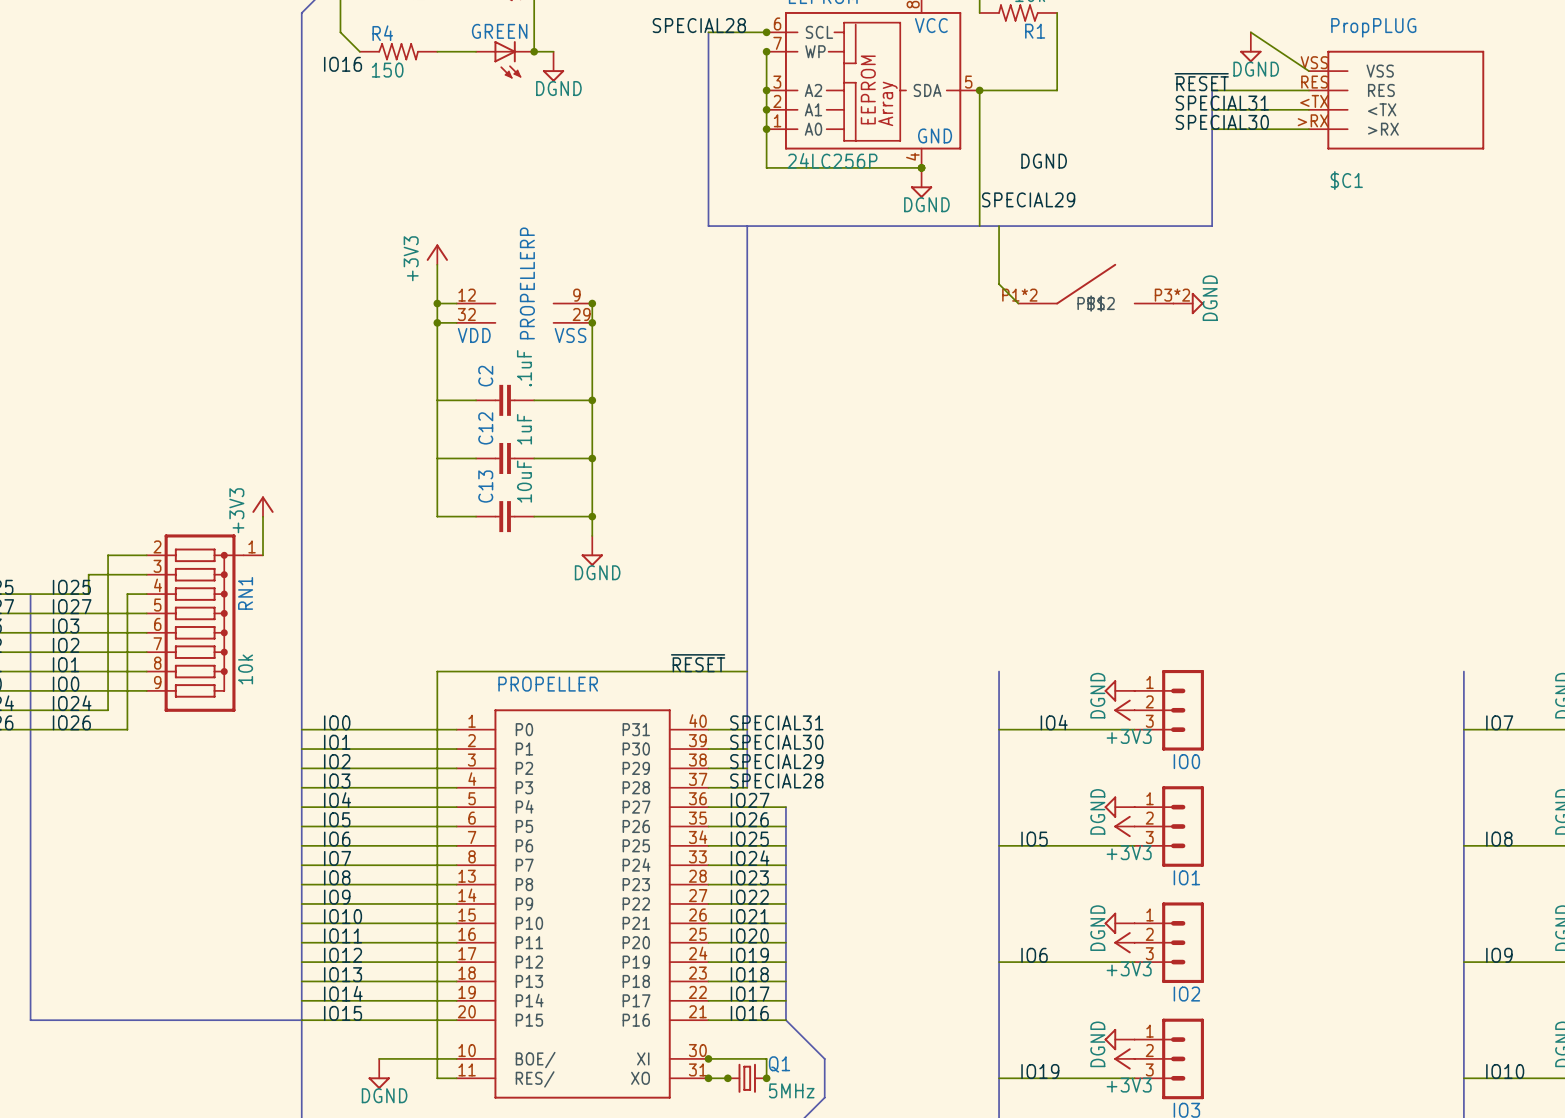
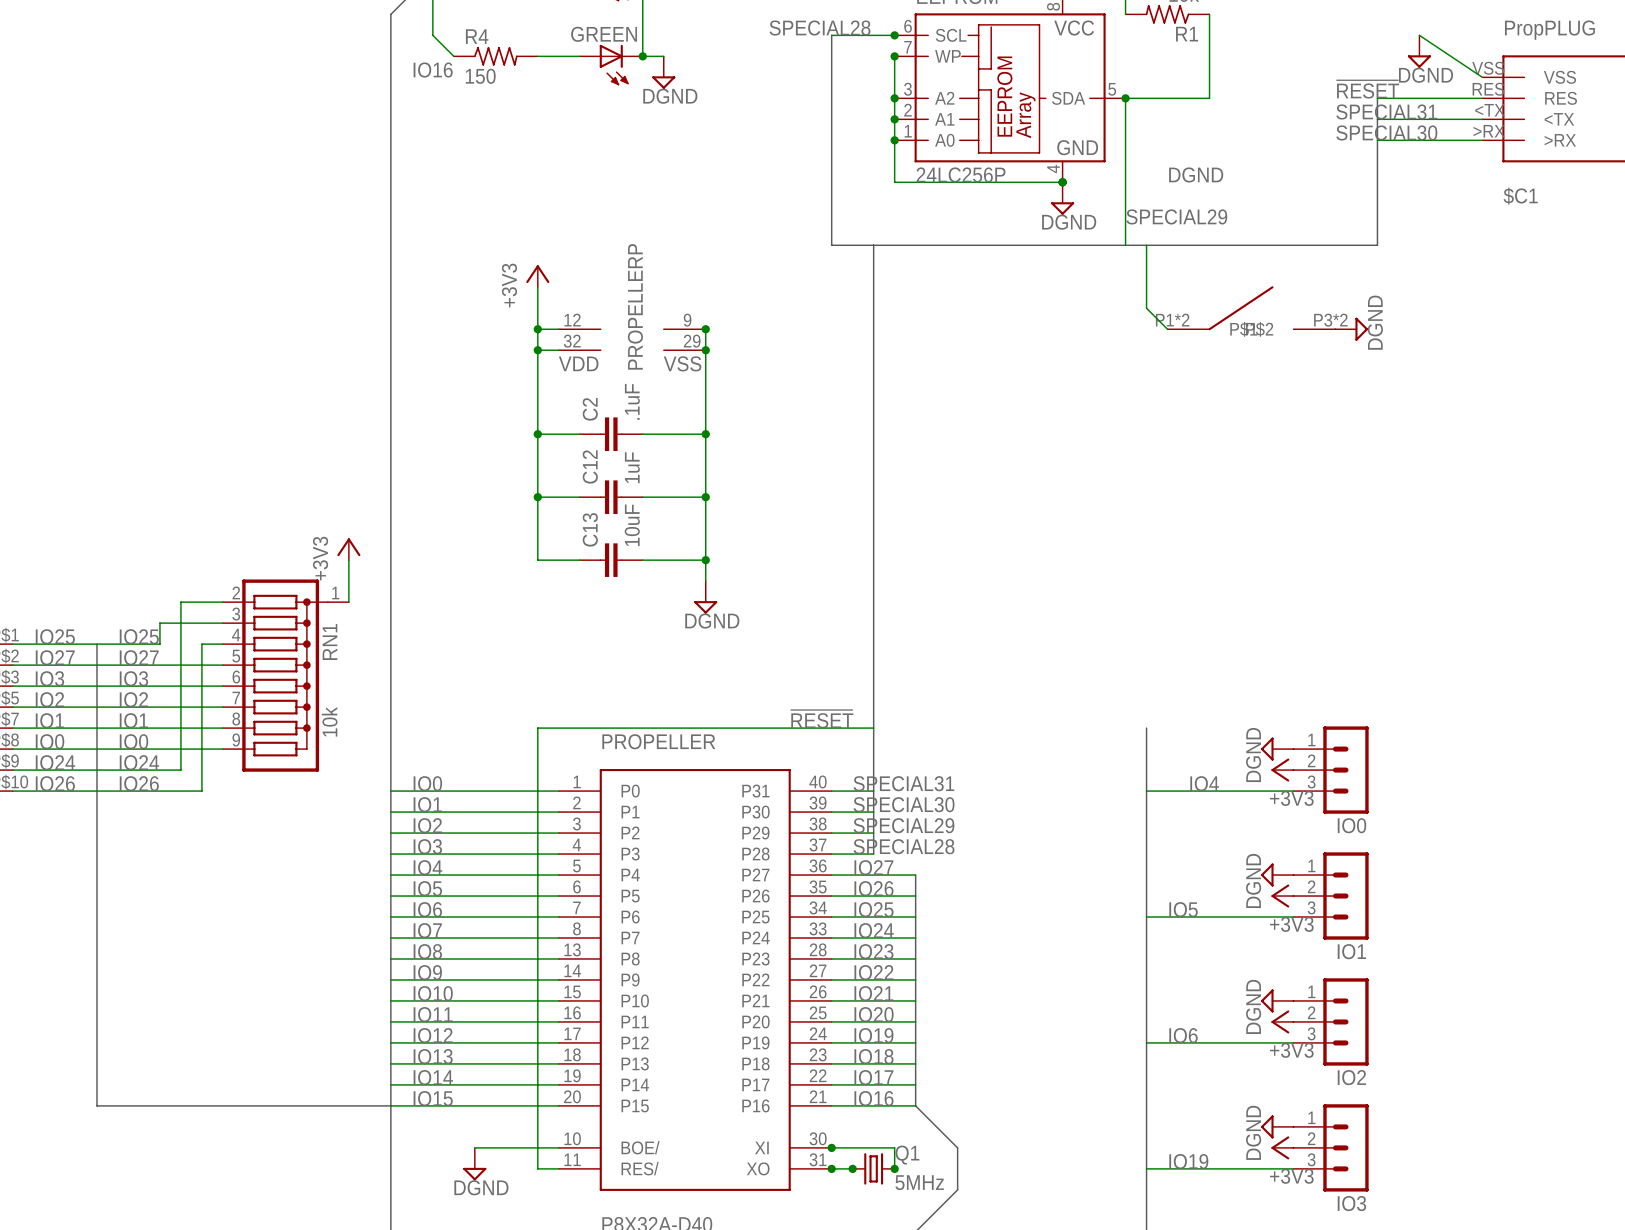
junction: none -> (537, 434)
junction: none -> (537, 497)

